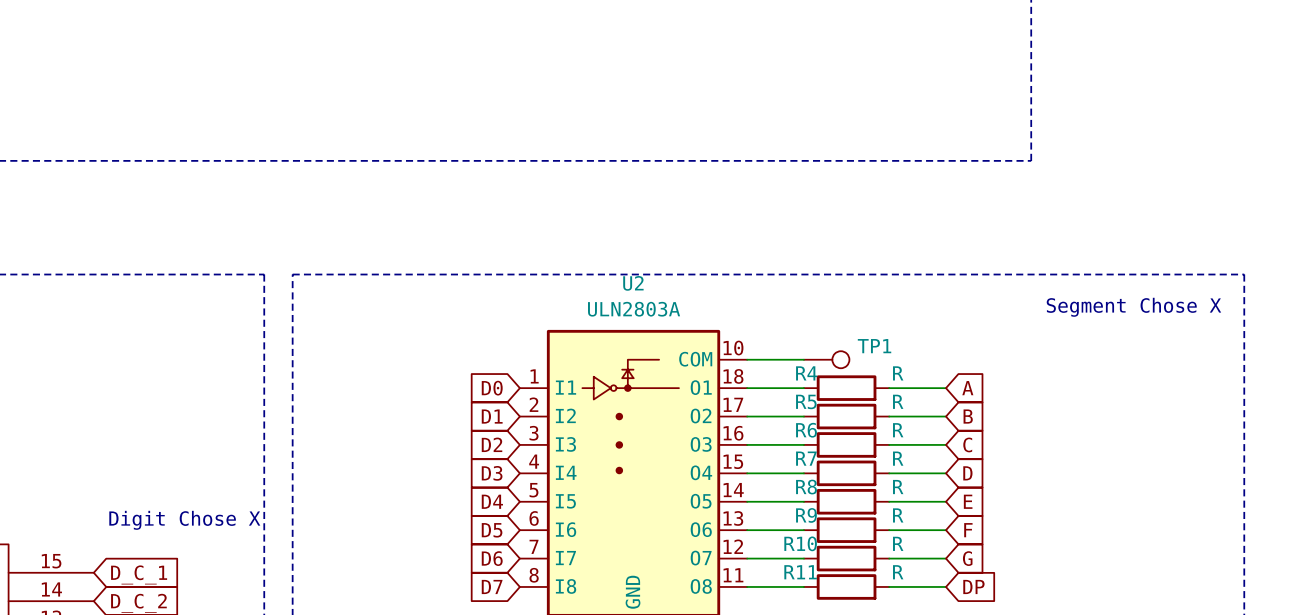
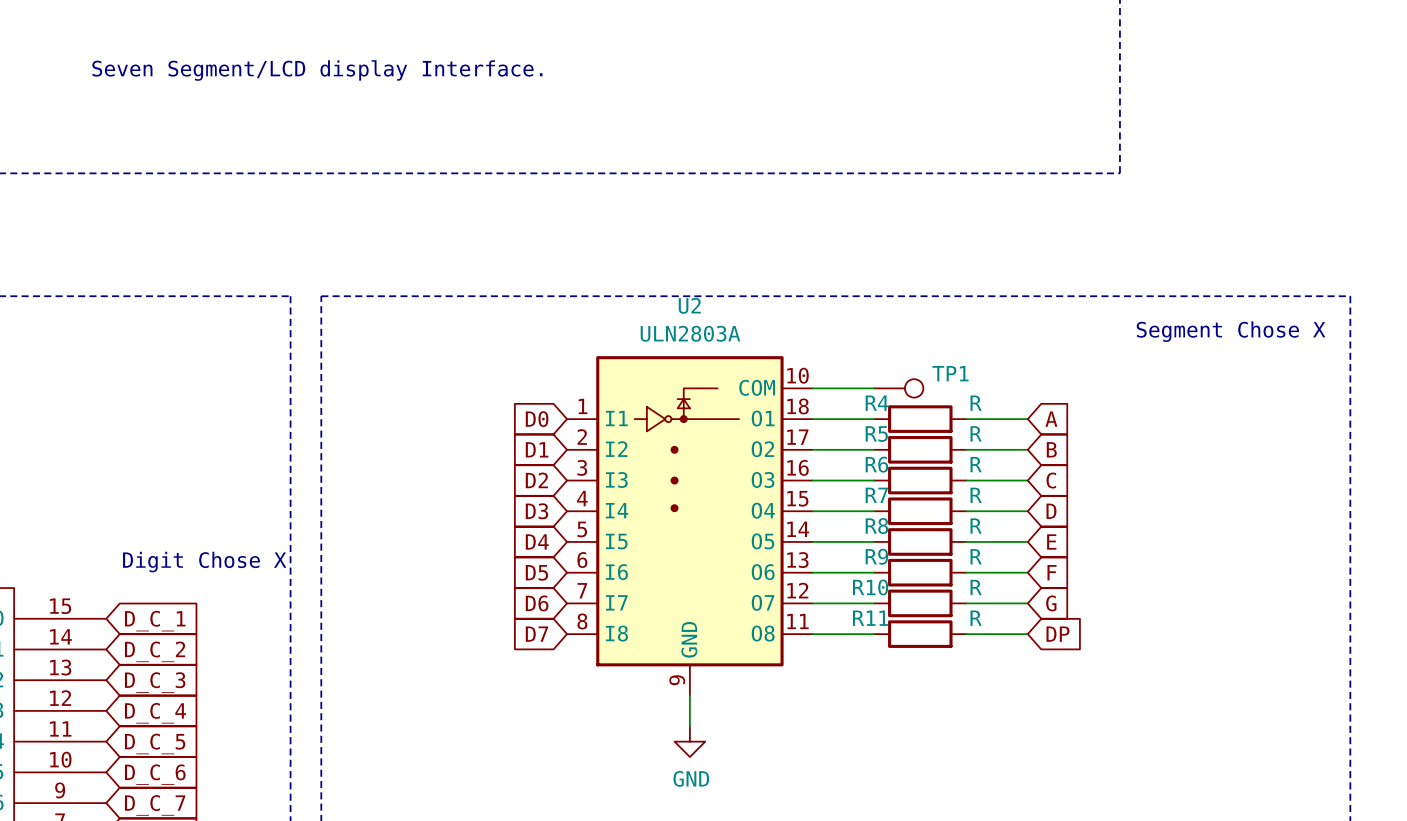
text: none -> Seven Segment/LCD display Interface. (317, 70)

